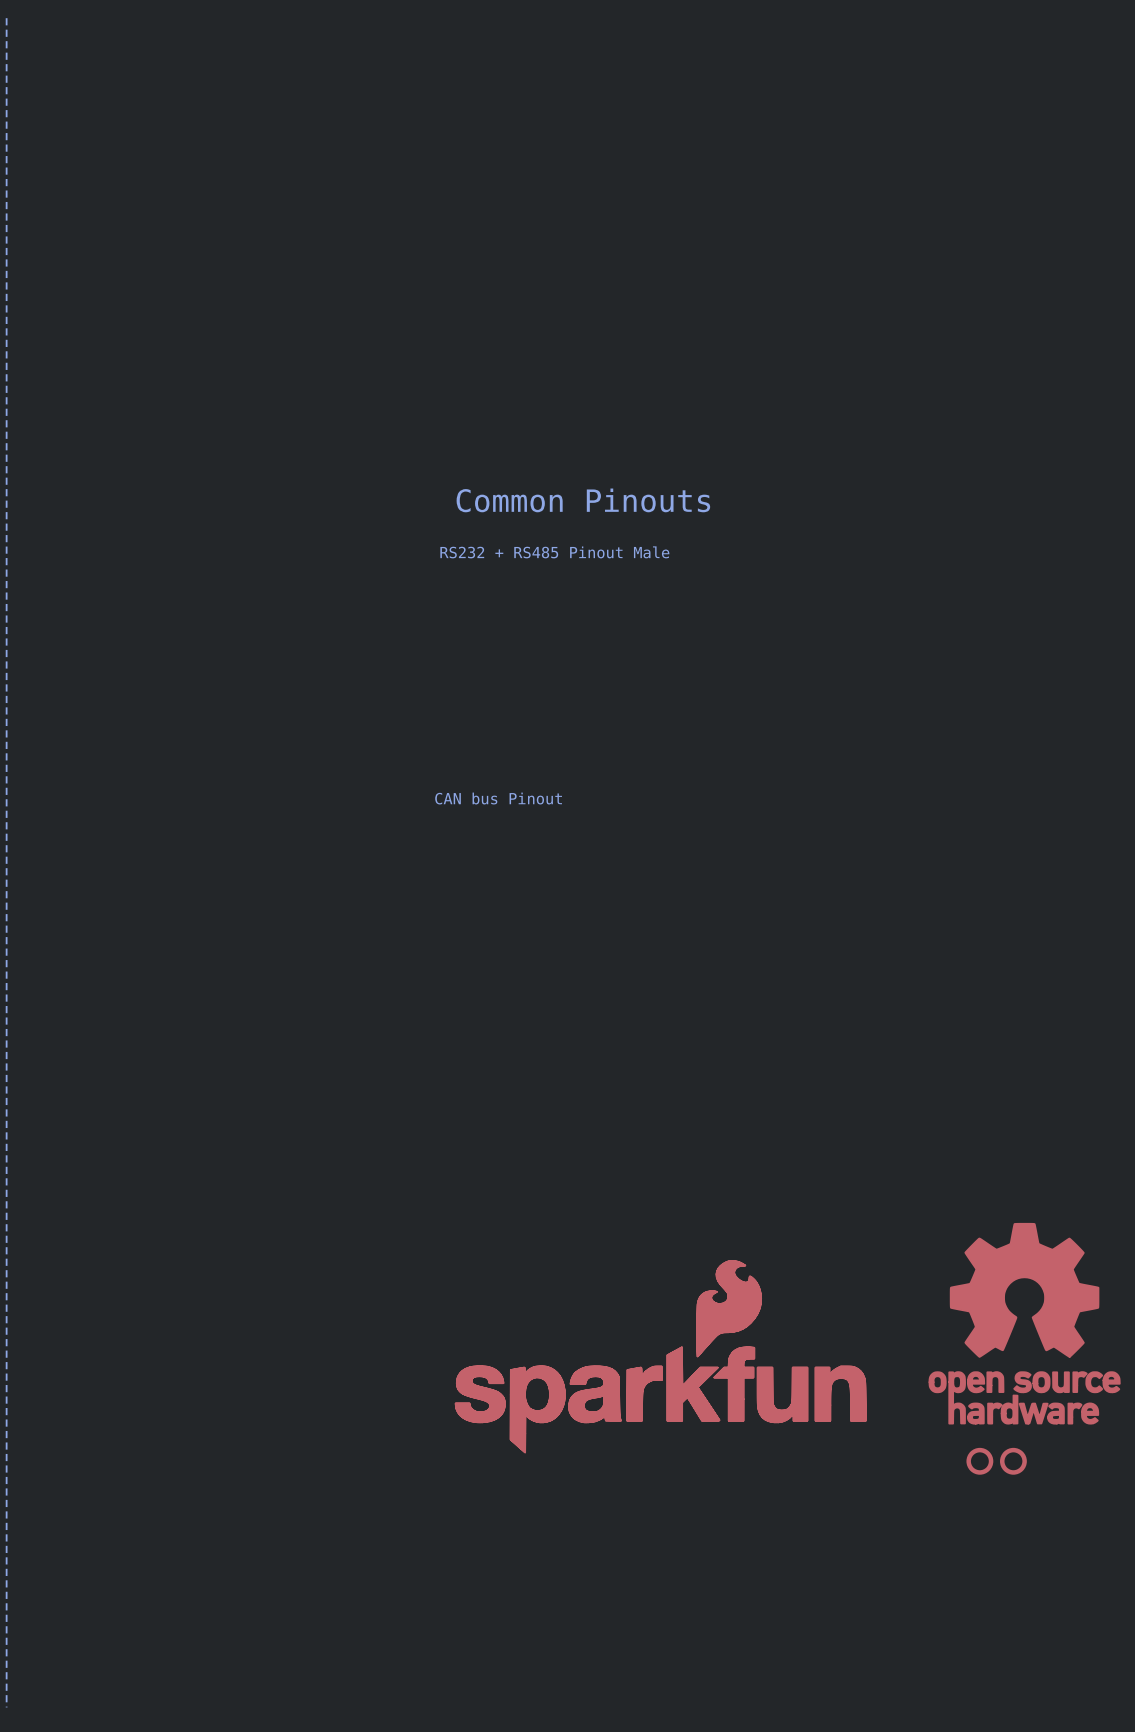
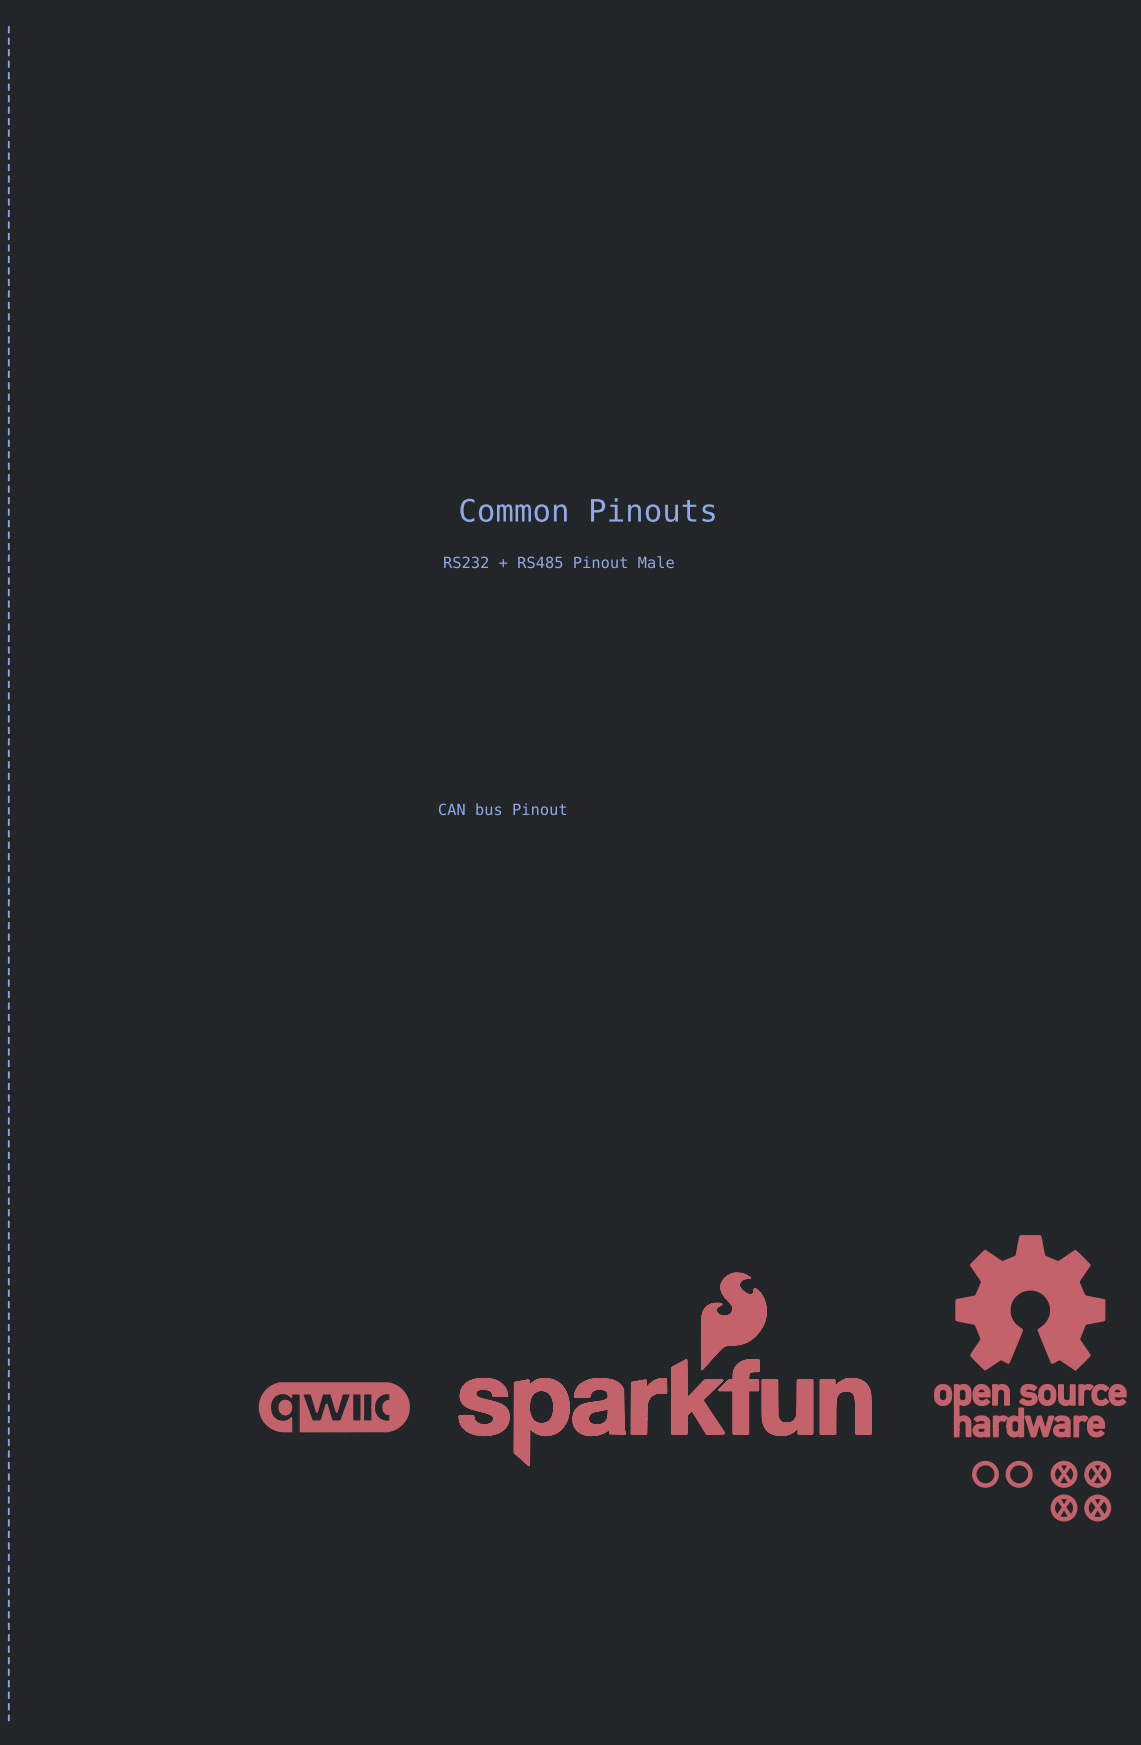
part: none -> (334, 1407)
part: none -> (1064, 1474)
part: none -> (1097, 1474)
part: none -> (1064, 1508)
part: none -> (1097, 1508)

